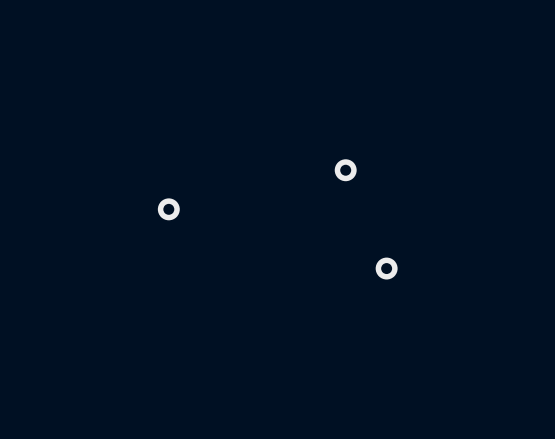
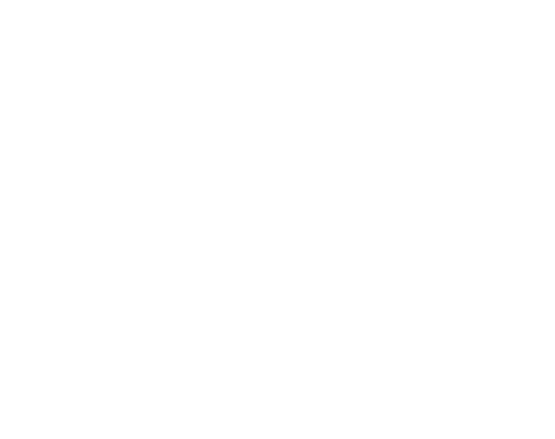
via: (345, 170) -> none
via: (168, 209) -> none
via: (386, 268) -> none

